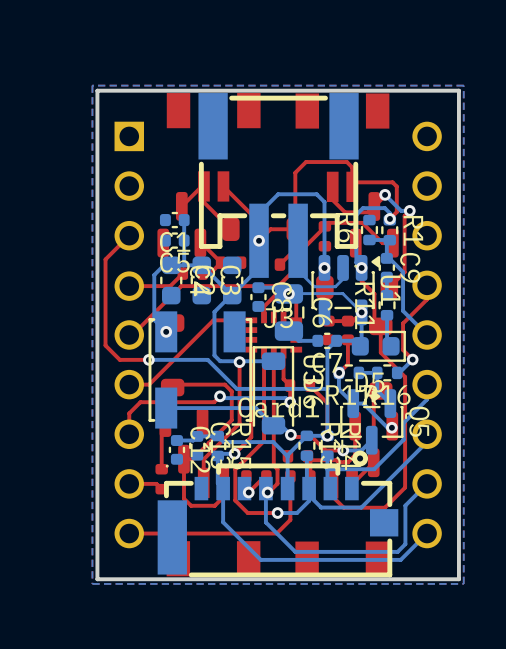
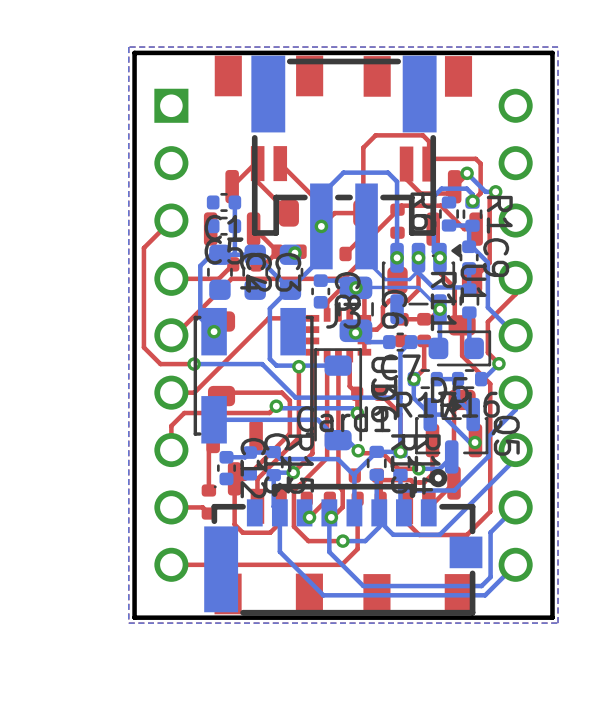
via: none -> (294, 253)
top track: none -> (418, 257) (418, 289) (407, 300) (389, 300) (382, 307) (382, 323) (376, 329) (364, 329) (364, 352)
via: none -> (418, 257)
bottom track: none -> (418, 270) (433, 287) (467, 287) (469, 289)
via: none -> (355, 332)

